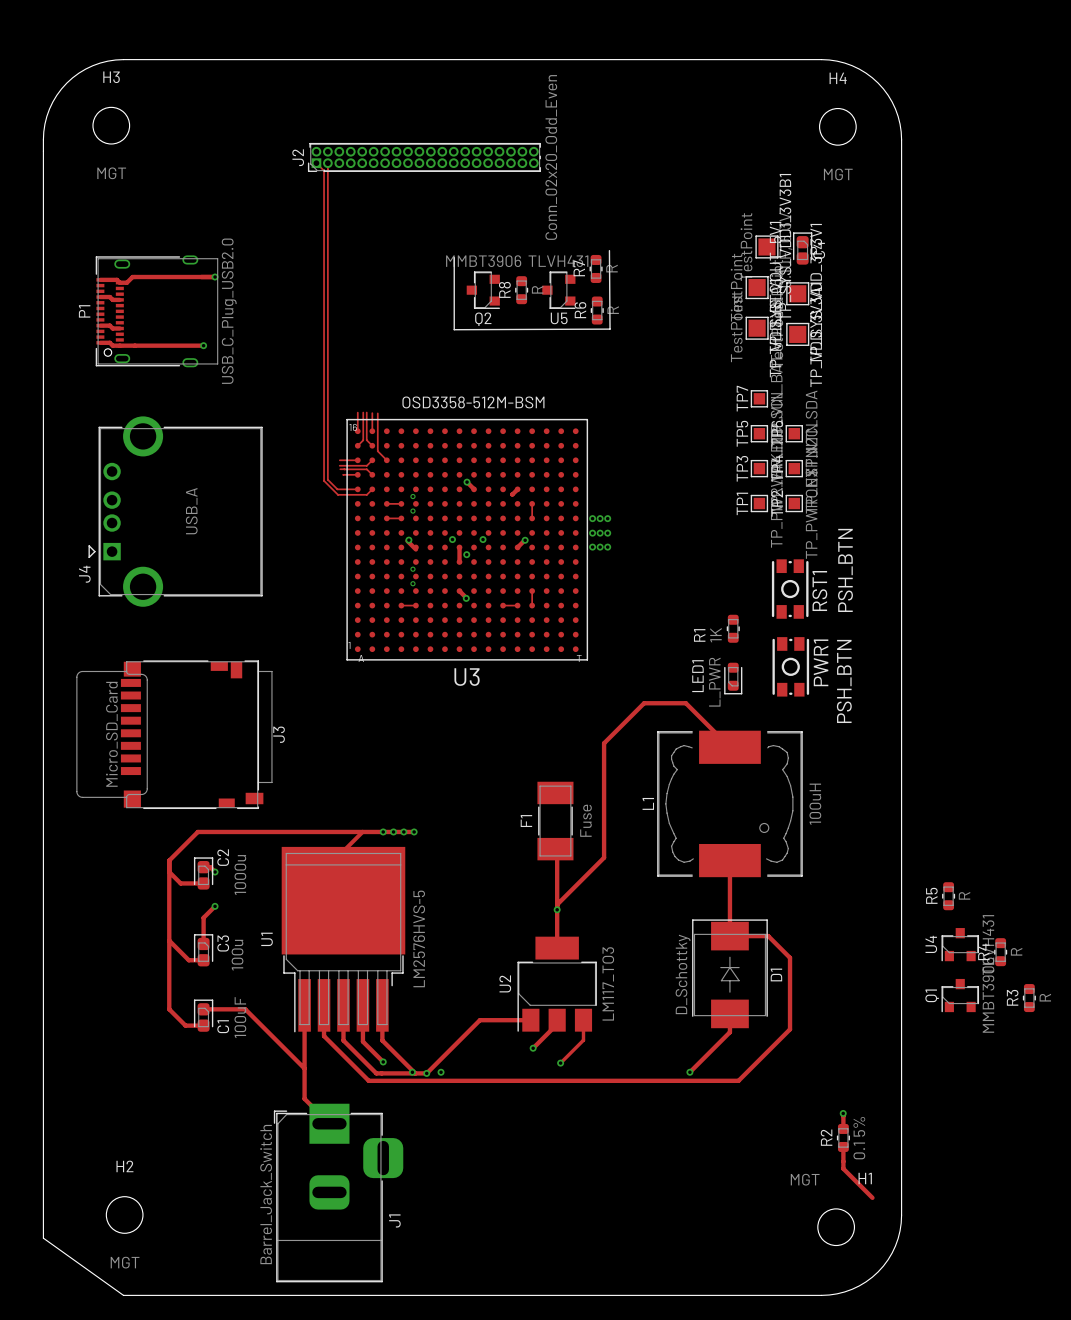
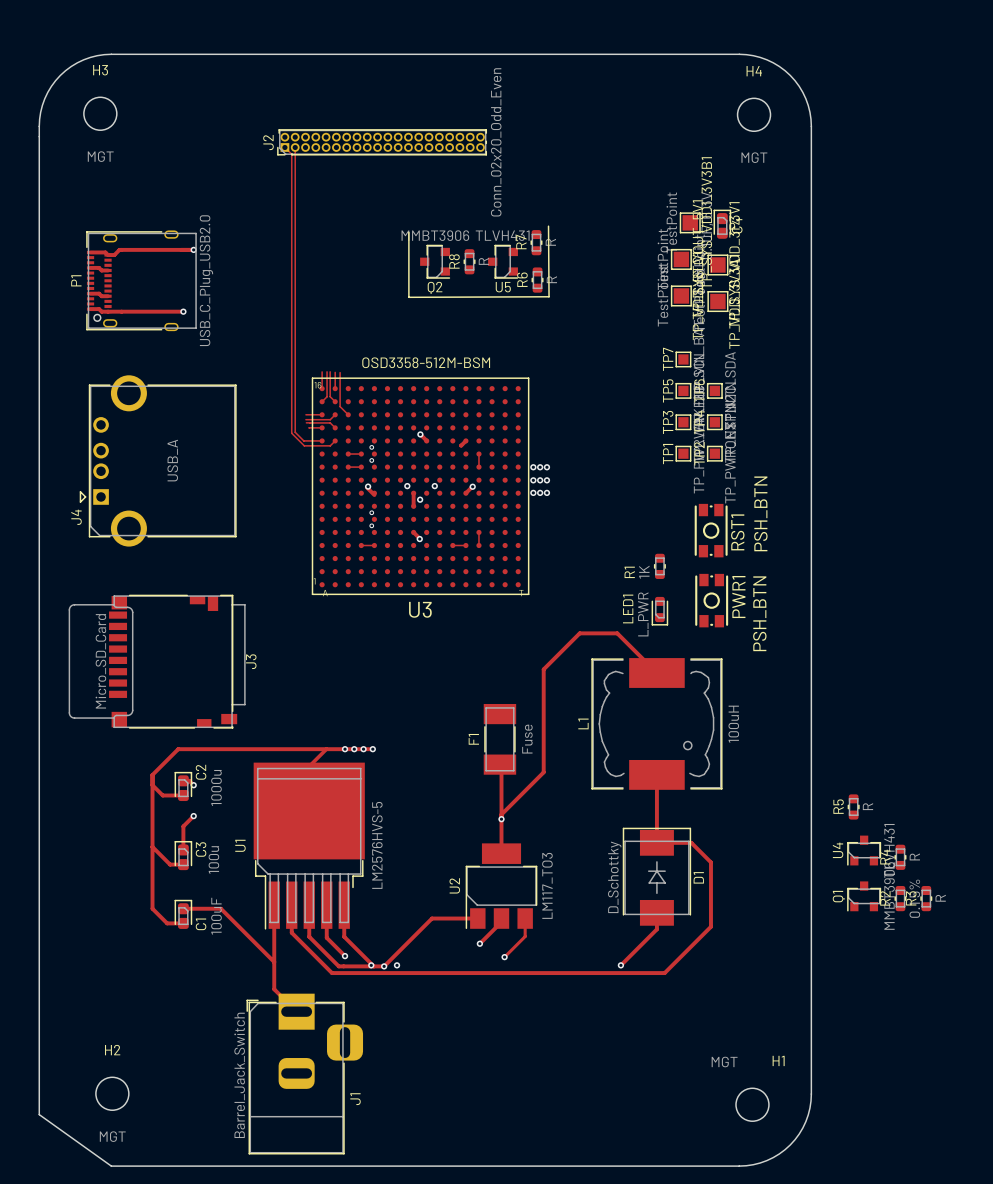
track: (843, 1113) (843, 1128) -> none
via: (843, 1113) -> none
R2 position: (843, 1137) -> (900, 898)
track: (843, 1146) (843, 1168) (872, 1197) -> none

